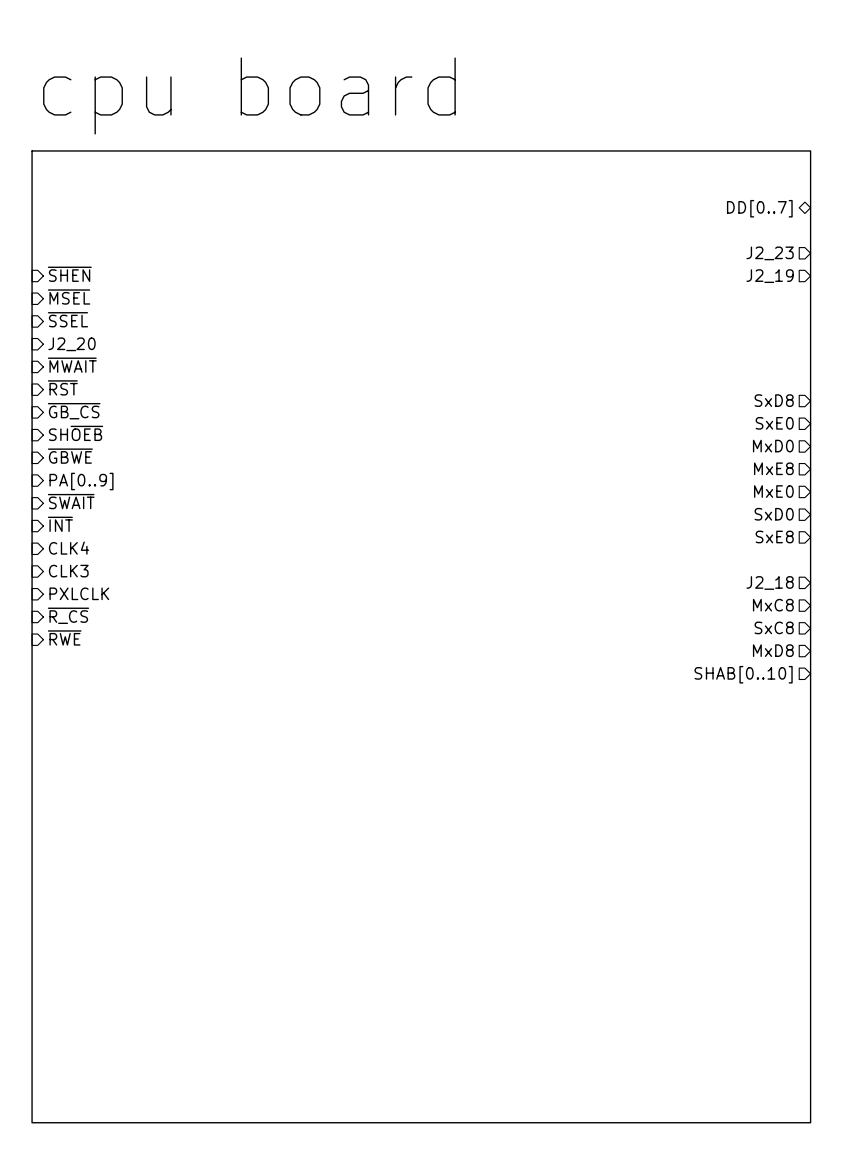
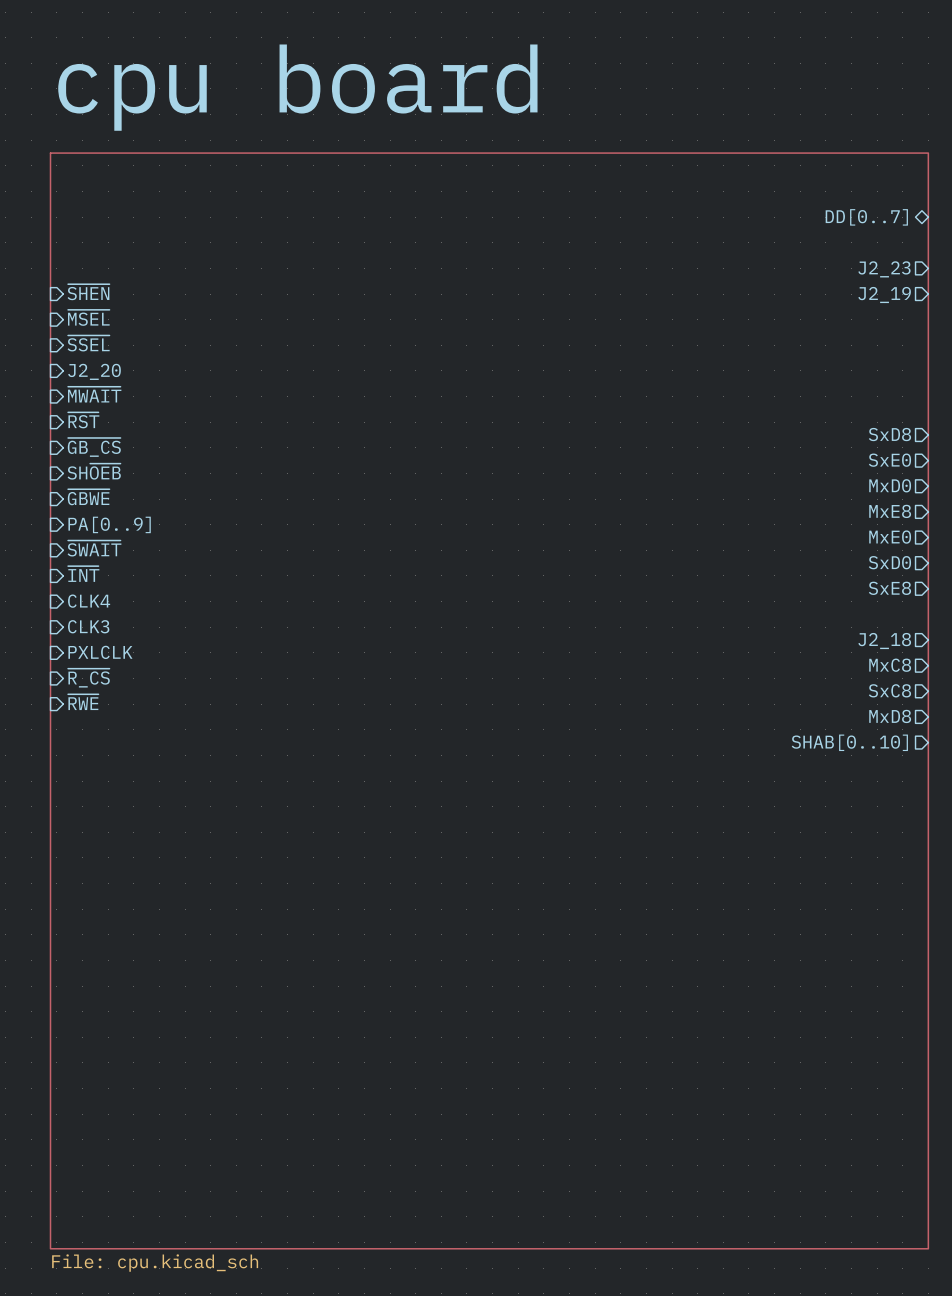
sheet cpu board value: none -> File: cpu.kicad_sch (155, 1263)

